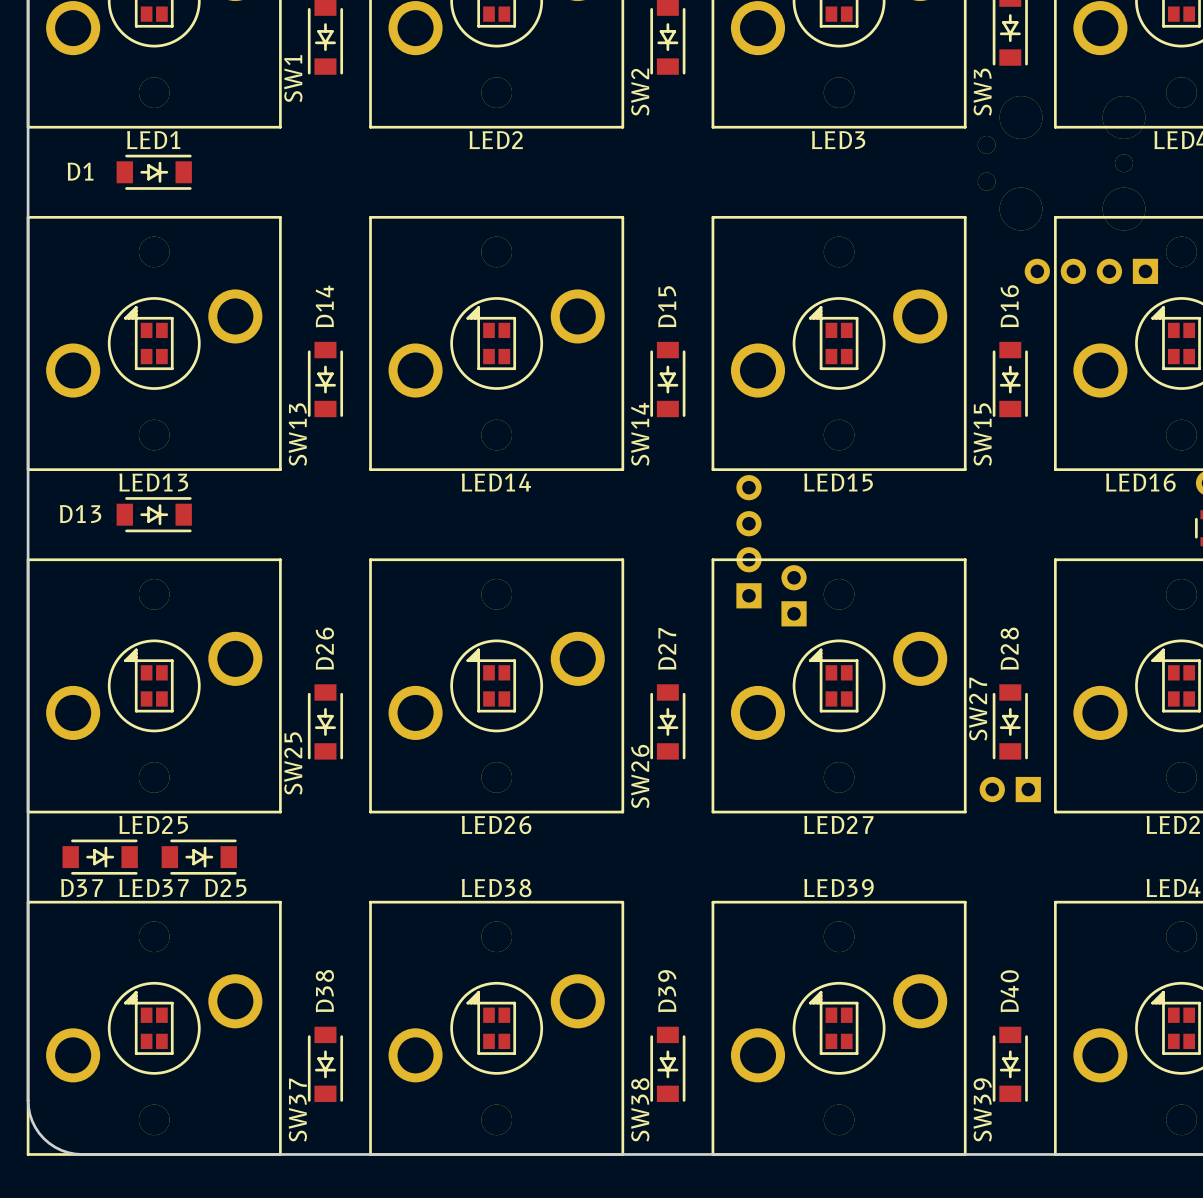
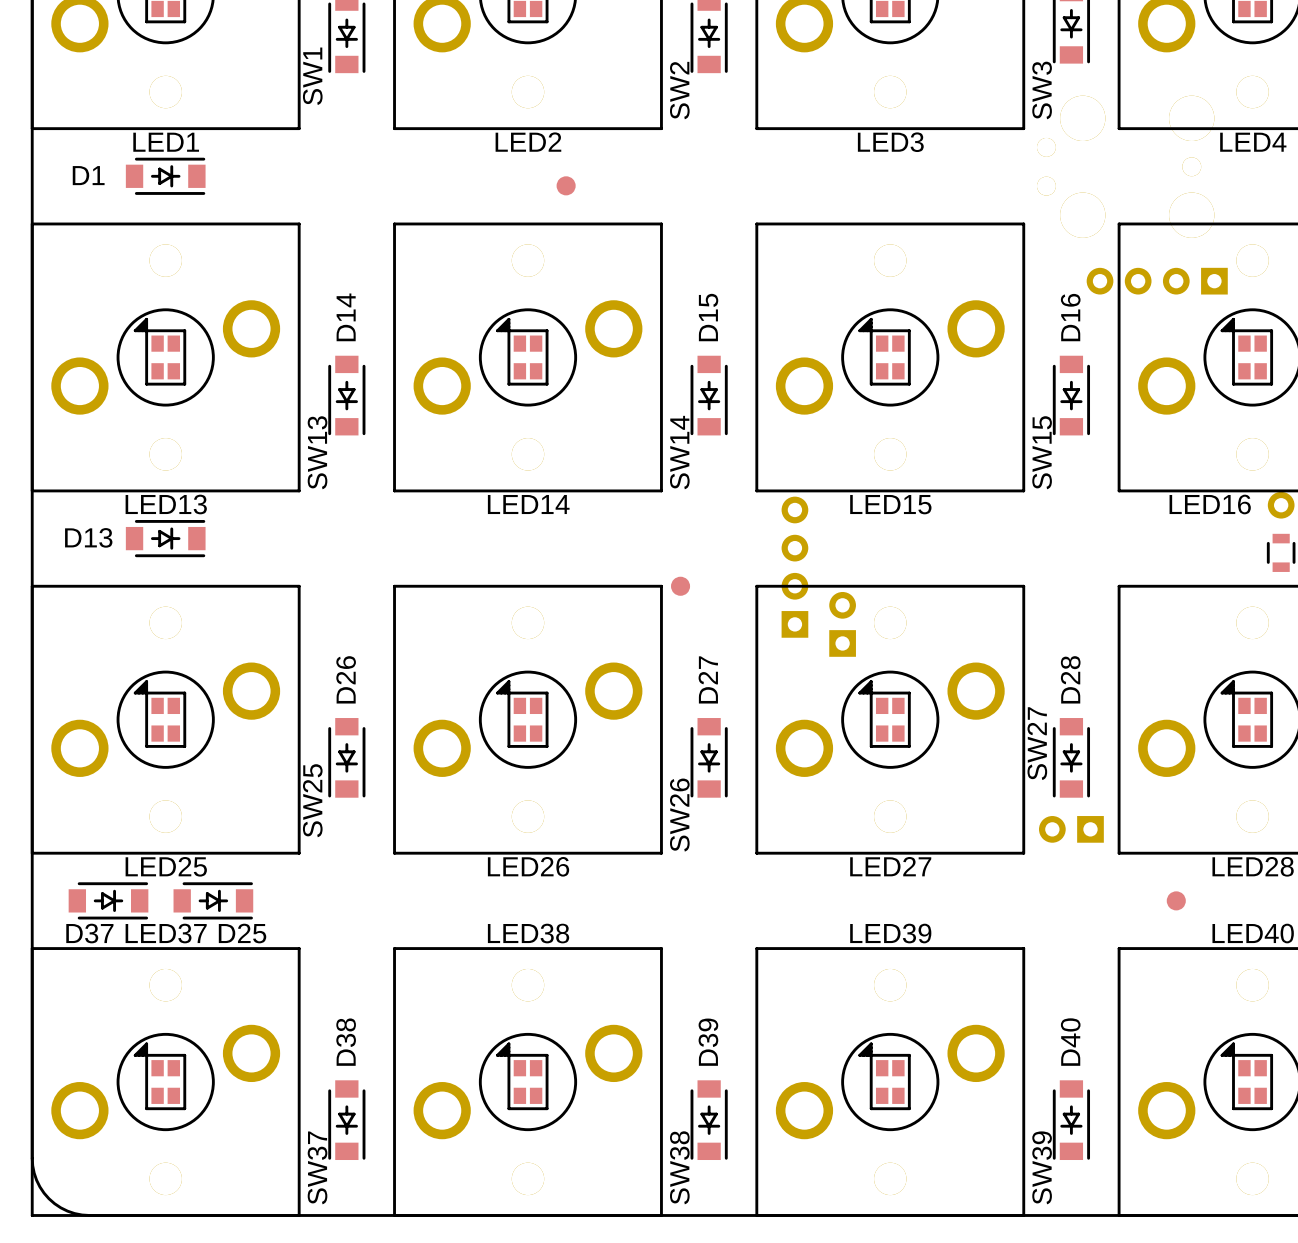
part: none -> (566, 185)
part: none -> (680, 586)
part: none -> (1176, 900)

